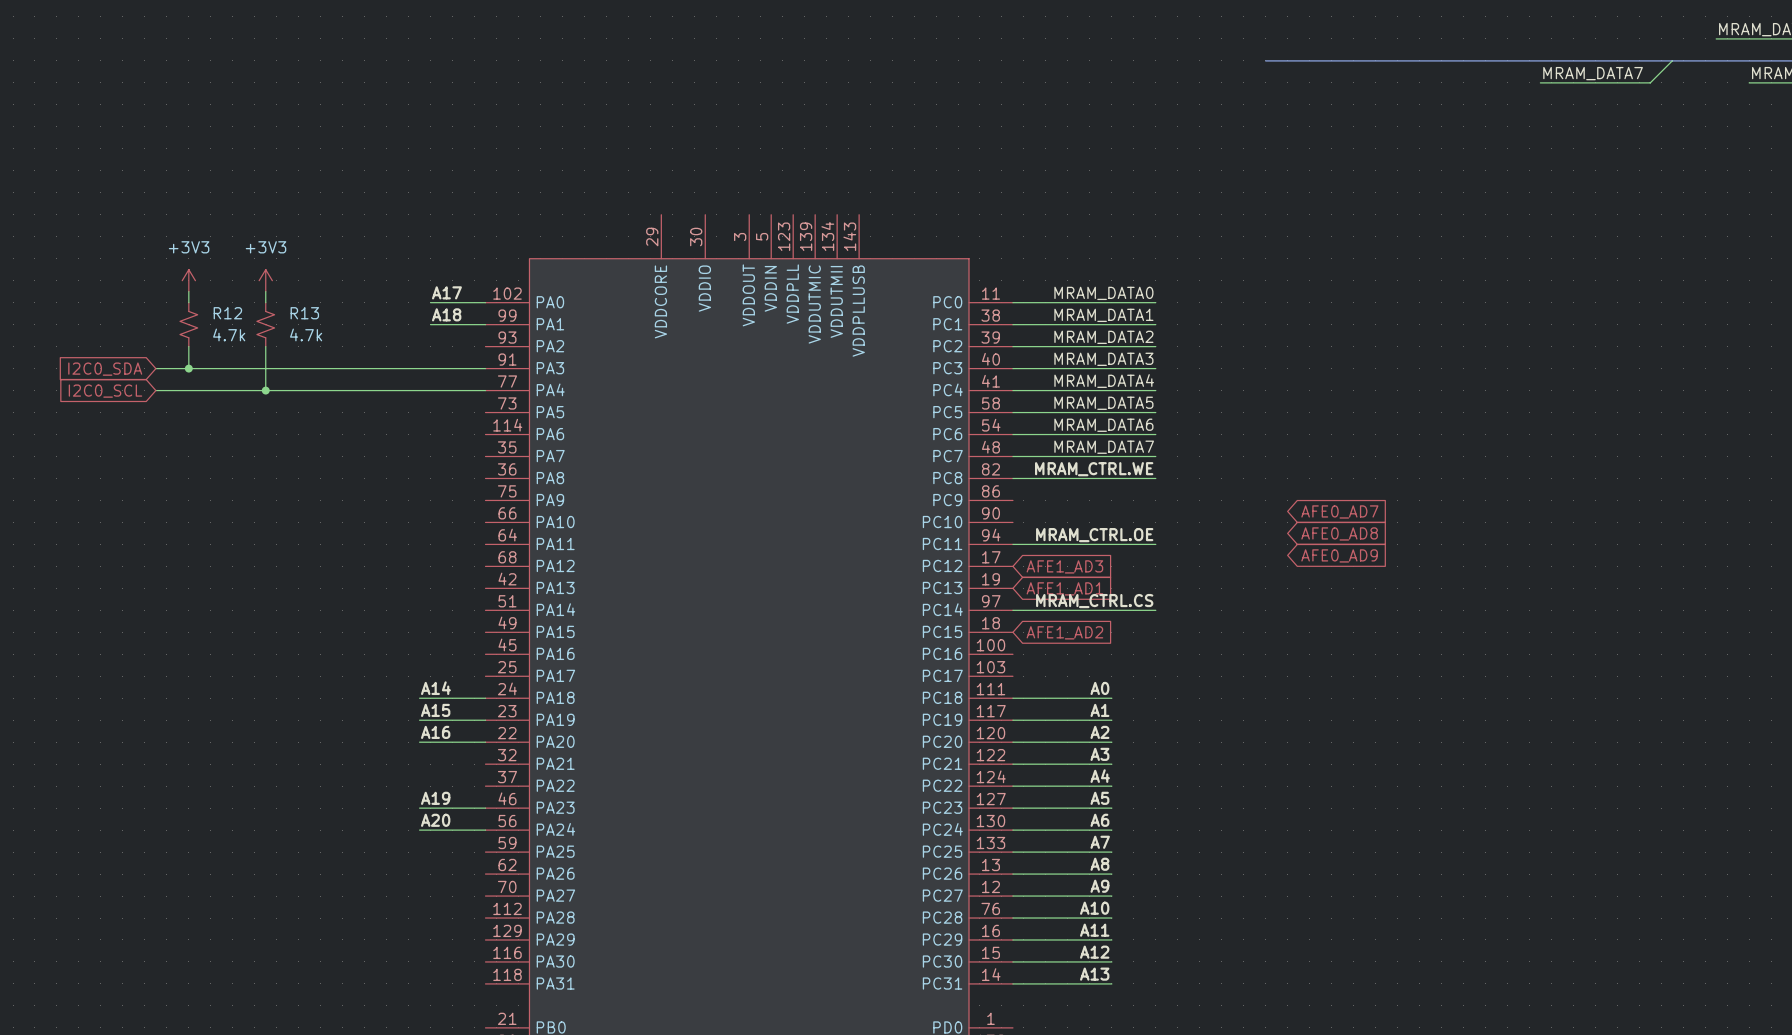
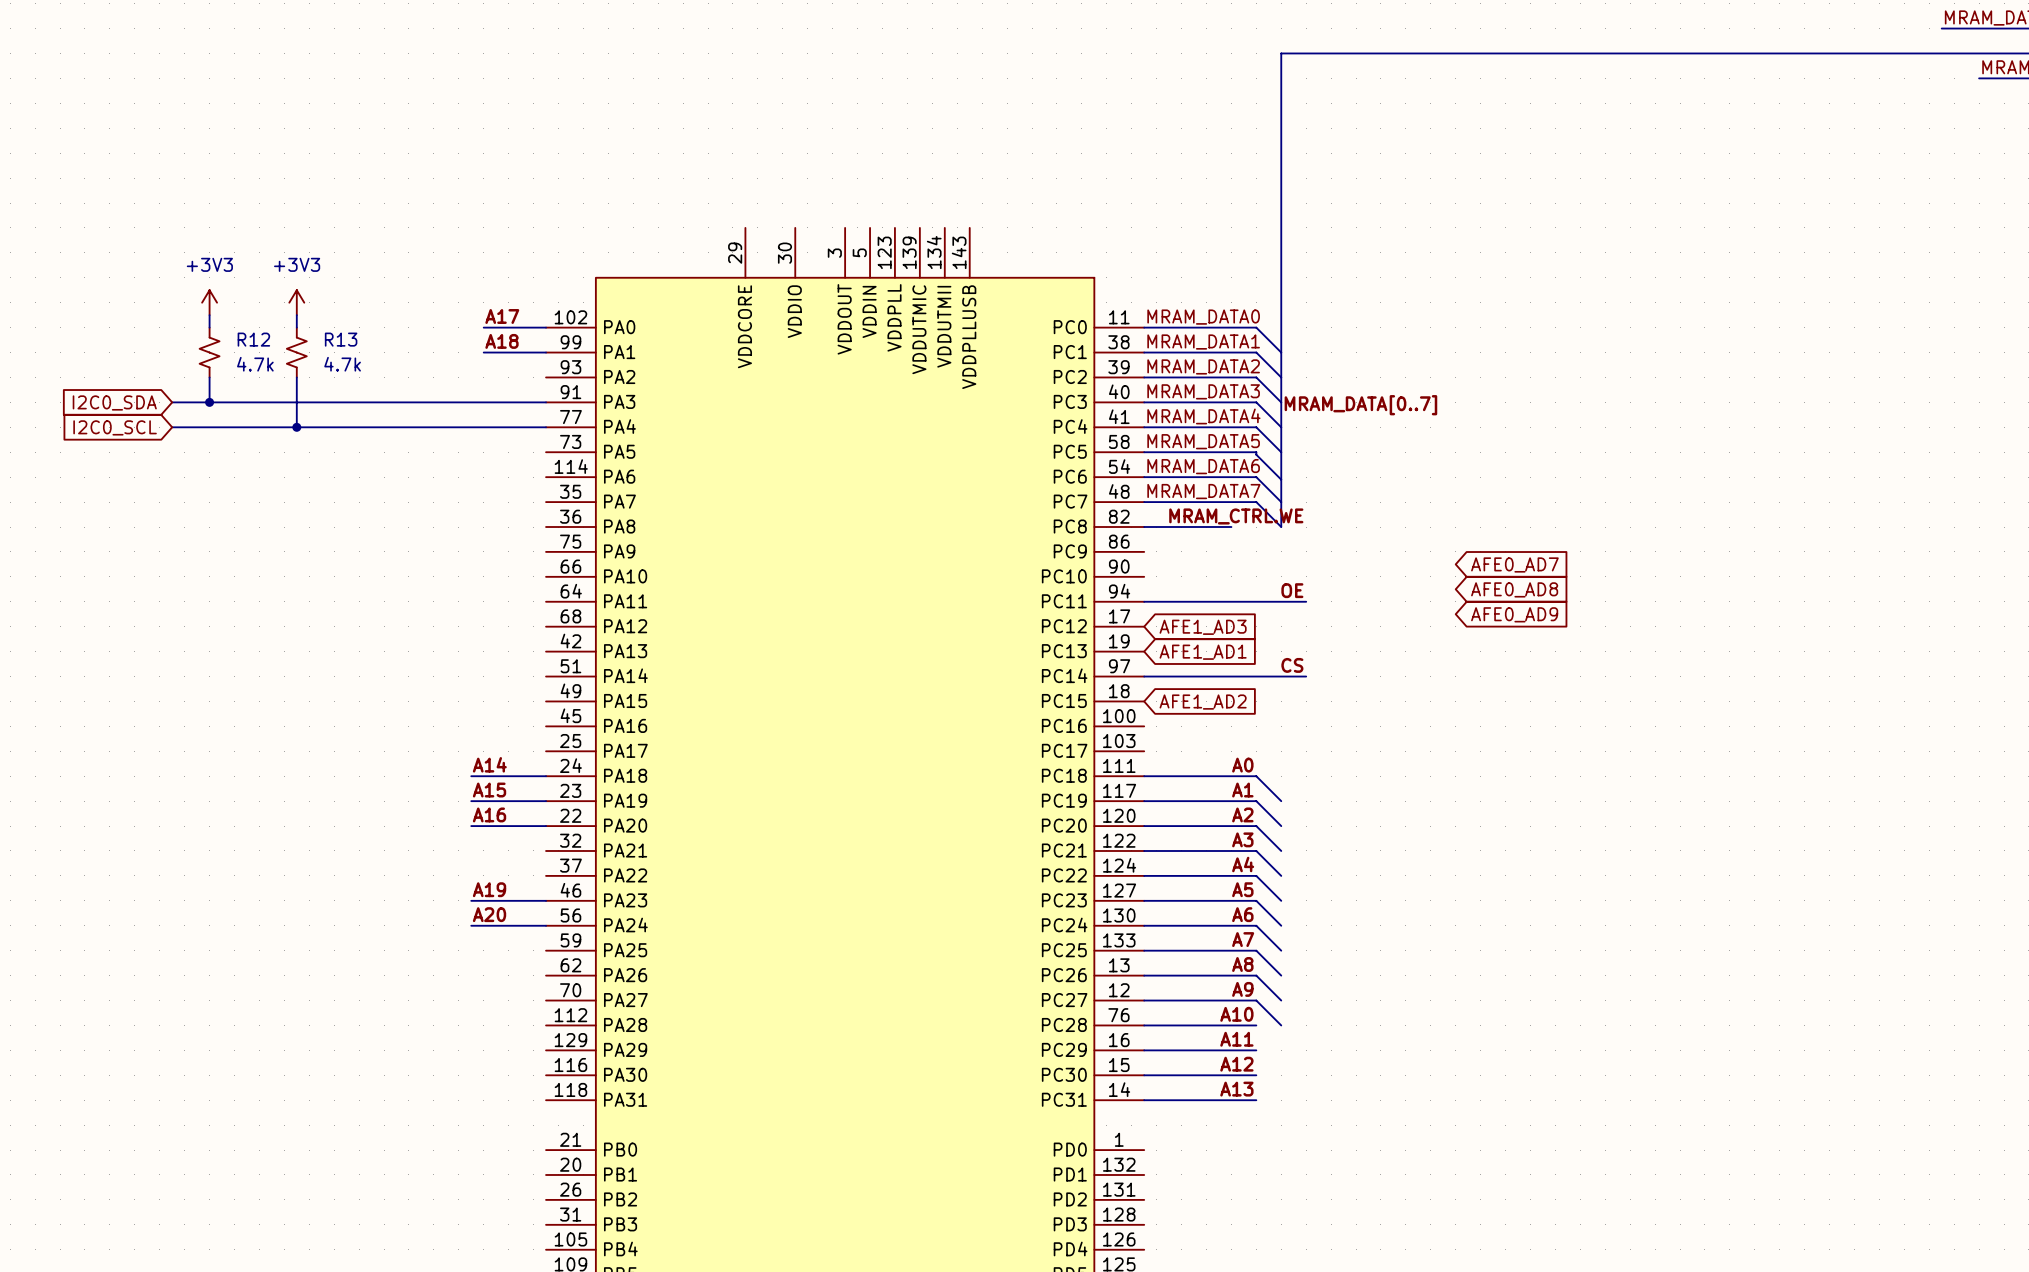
bus: none -> (1430, 53) (1281, 53) (1281, 527)
wire: (1672, 60) (1650, 82) (1540, 82) -> none
label: MRAM_DATA7 (1593, 73) -> none
label position: MRAM_DATA0 (1103, 293) -> MRAM_DATA0 (1203, 317)
wire: (1111, 302) (1155, 302) -> (1256, 327) (1281, 352)
label position: MRAM_DATA1 (1103, 315) -> MRAM_DATA1 (1203, 342)
wire: (1111, 324) (1155, 324) -> (1256, 352) (1281, 377)
label position: MRAM_DATA2 (1103, 337) -> MRAM_DATA2 (1203, 366)
wire: (1111, 346) (1155, 346) -> (1256, 377) (1281, 402)
label position: MRAM_DATA3 (1103, 359) -> MRAM_DATA3 (1203, 391)
wire: (1111, 368) (1155, 368) -> (1256, 402) (1281, 427)
label: none -> MRAM_DATA[0..7] (1360, 405)
label position: MRAM_DATA4 (1104, 381) -> MRAM_DATA4 (1203, 416)
wire: (1111, 390) (1155, 390) -> (1256, 427) (1281, 452)
label position: MRAM_DATA5 (1103, 403) -> MRAM_DATA5 (1203, 441)
wire: (1111, 412) (1155, 412) -> (1256, 452) (1256, 454) (1281, 479)
label position: MRAM_DATA6 (1103, 425) -> MRAM_DATA6 (1203, 466)
wire: (1111, 434) (1155, 434) -> (1256, 477) (1281, 502)
label position: MRAM_DATA7 (1104, 447) -> MRAM_DATA7 (1203, 491)
wire: (1111, 456) (1155, 456) -> (1256, 502) (1281, 527)
wire: (1089, 478) (1155, 478) -> none
label: MRAM_CTRL.OE (1094, 535) -> OE (1292, 590)
label: MRAM_CTRL.CS (1094, 601) -> CS (1292, 665)
wire: none -> (1256, 776) (1281, 801)
wire: none -> (1256, 801) (1281, 826)
wire: none -> (1256, 826) (1281, 850)
wire: none -> (1256, 850) (1281, 875)
wire: none -> (1256, 875) (1281, 900)
wire: none -> (1256, 900) (1281, 925)
wire: none -> (1256, 925) (1281, 950)
wire: none -> (1256, 950) (1281, 975)
wire: none -> (1256, 975) (1281, 1000)
wire: none -> (1256, 1000) (1281, 1025)

